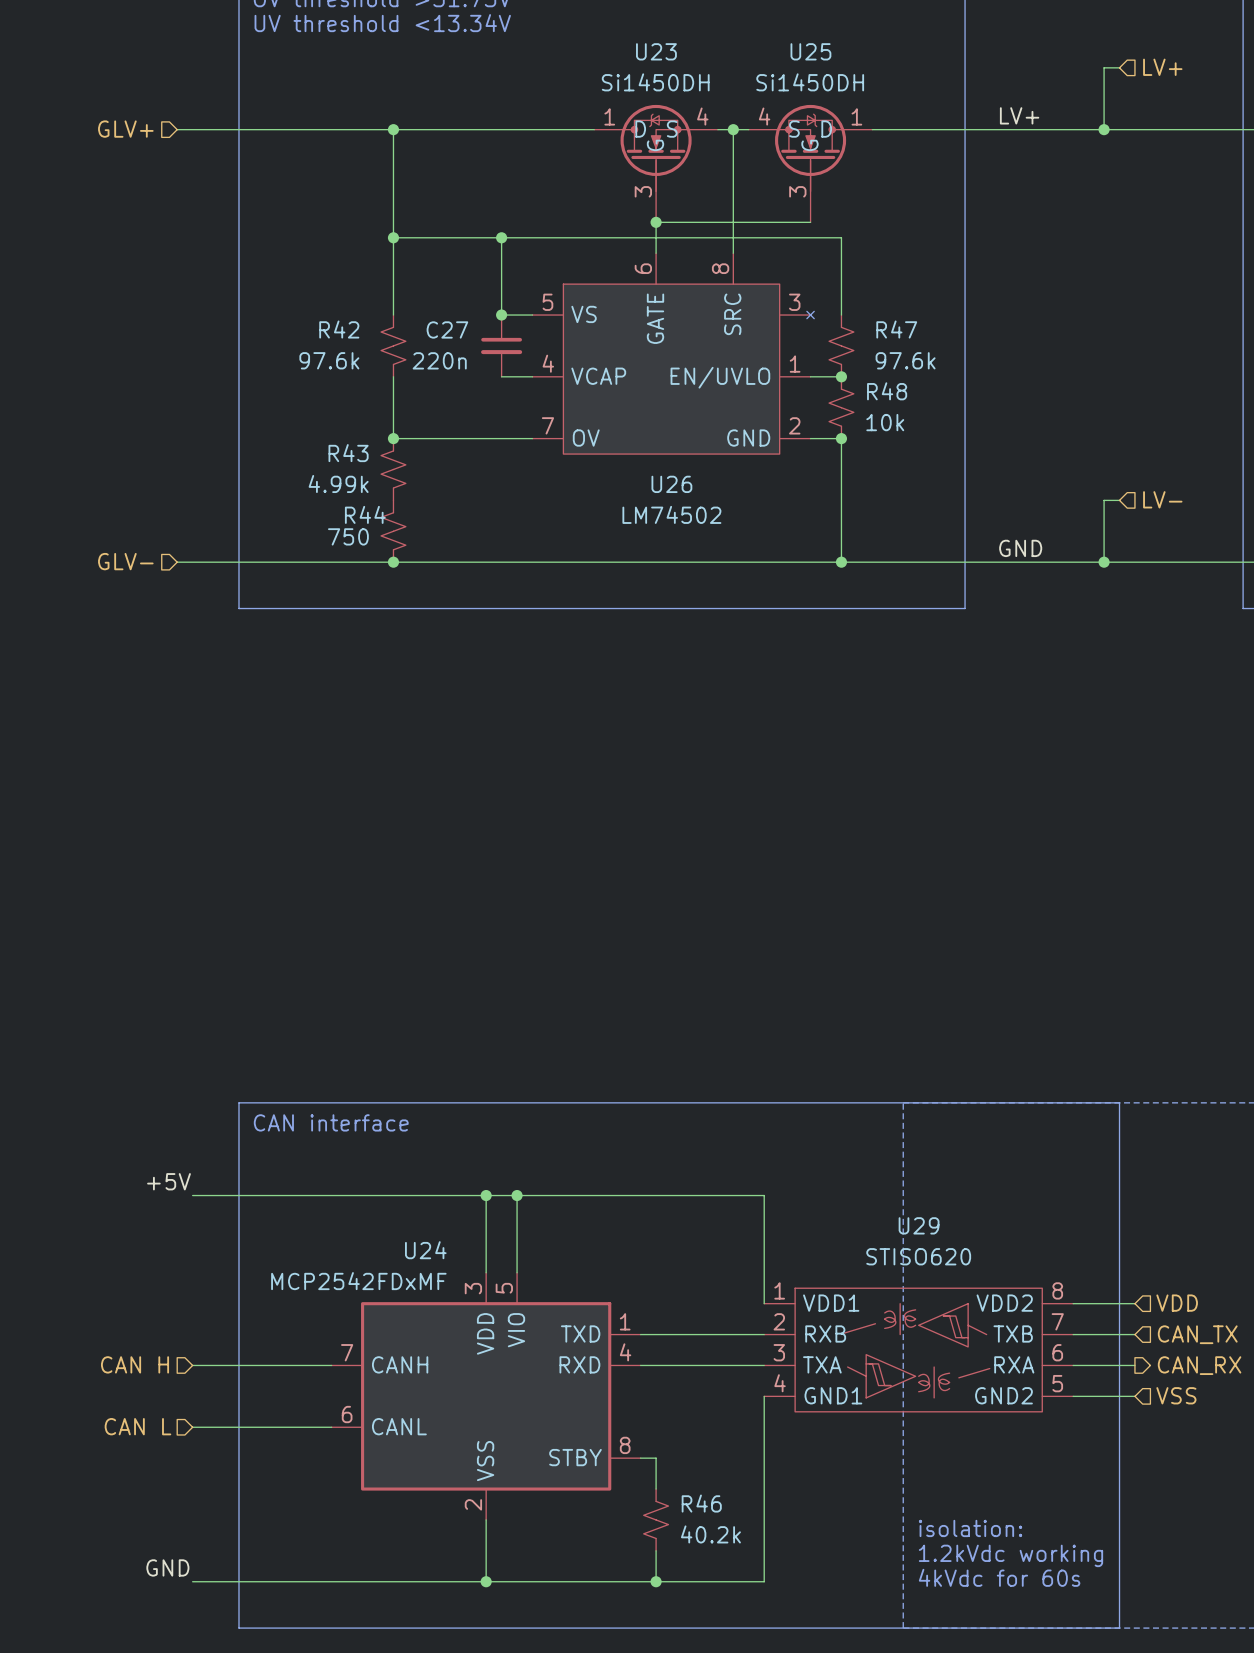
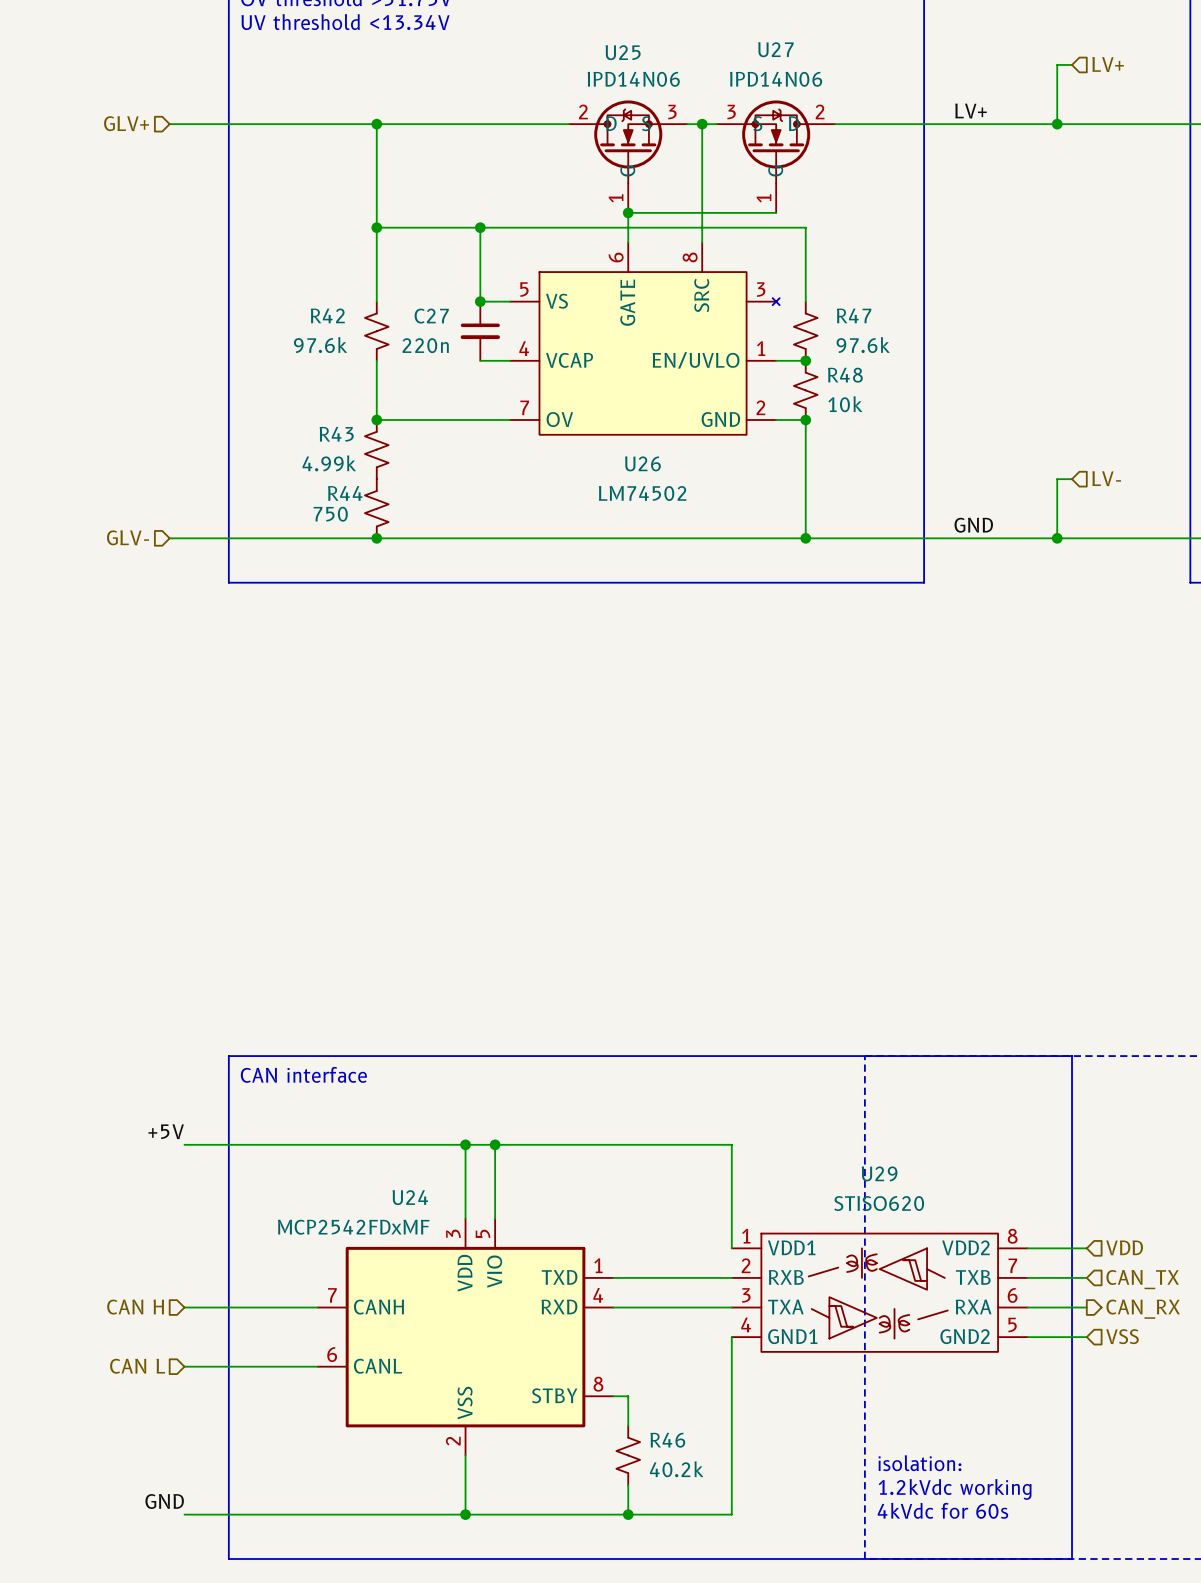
U25 value: Si1450DH (810, 82) -> IPD14N06 (633, 79)
U25 symbol: [748, 104, 873, 223] -> [569, 100, 688, 213]
U23: Si1450DH (656, 163) -> none
U27: none -> IPD14N06 (776, 156)

